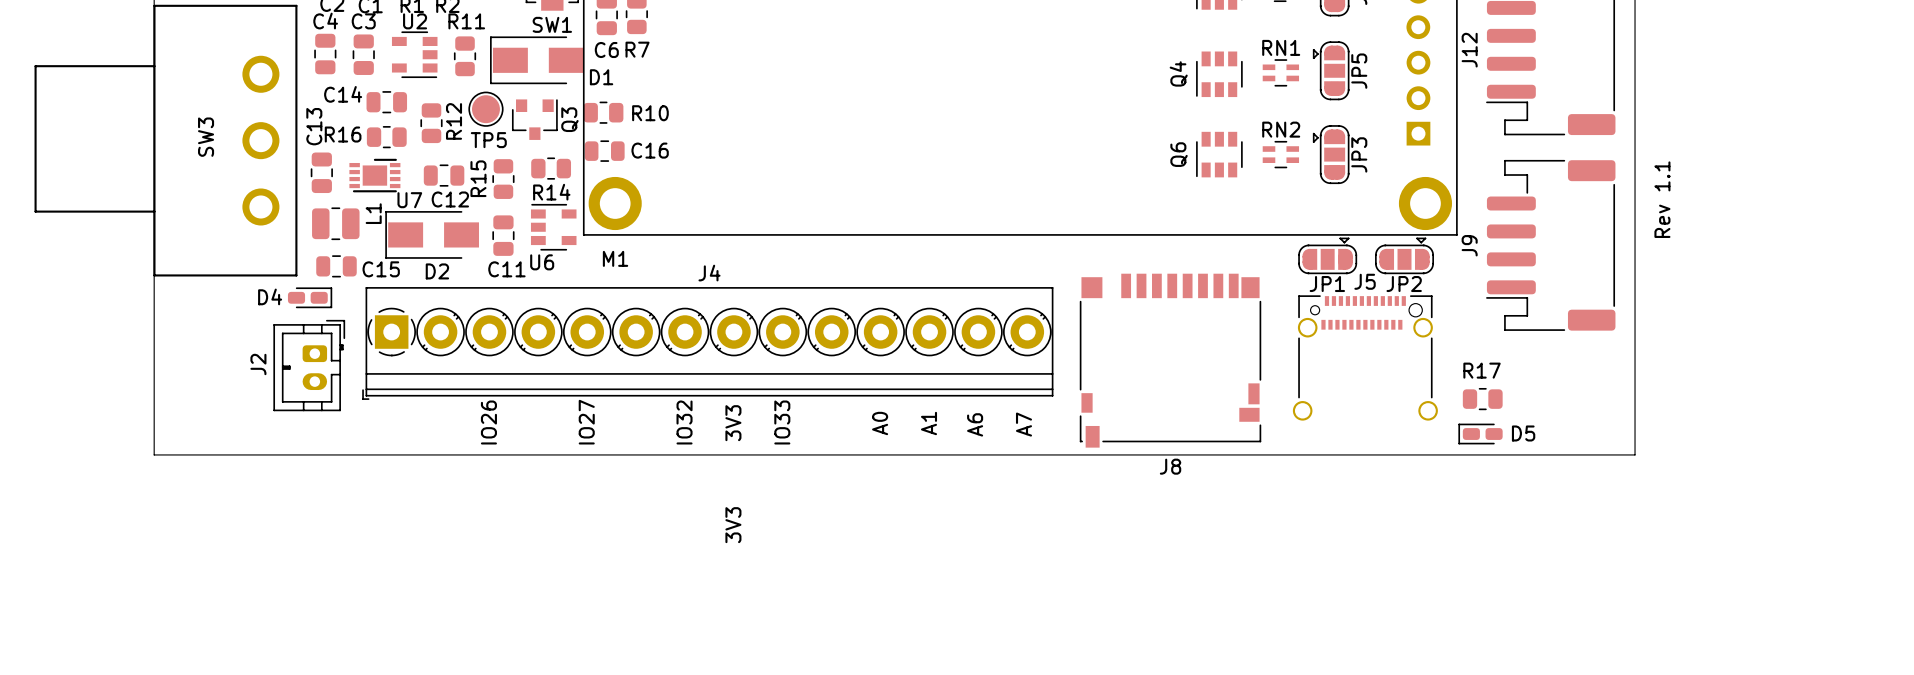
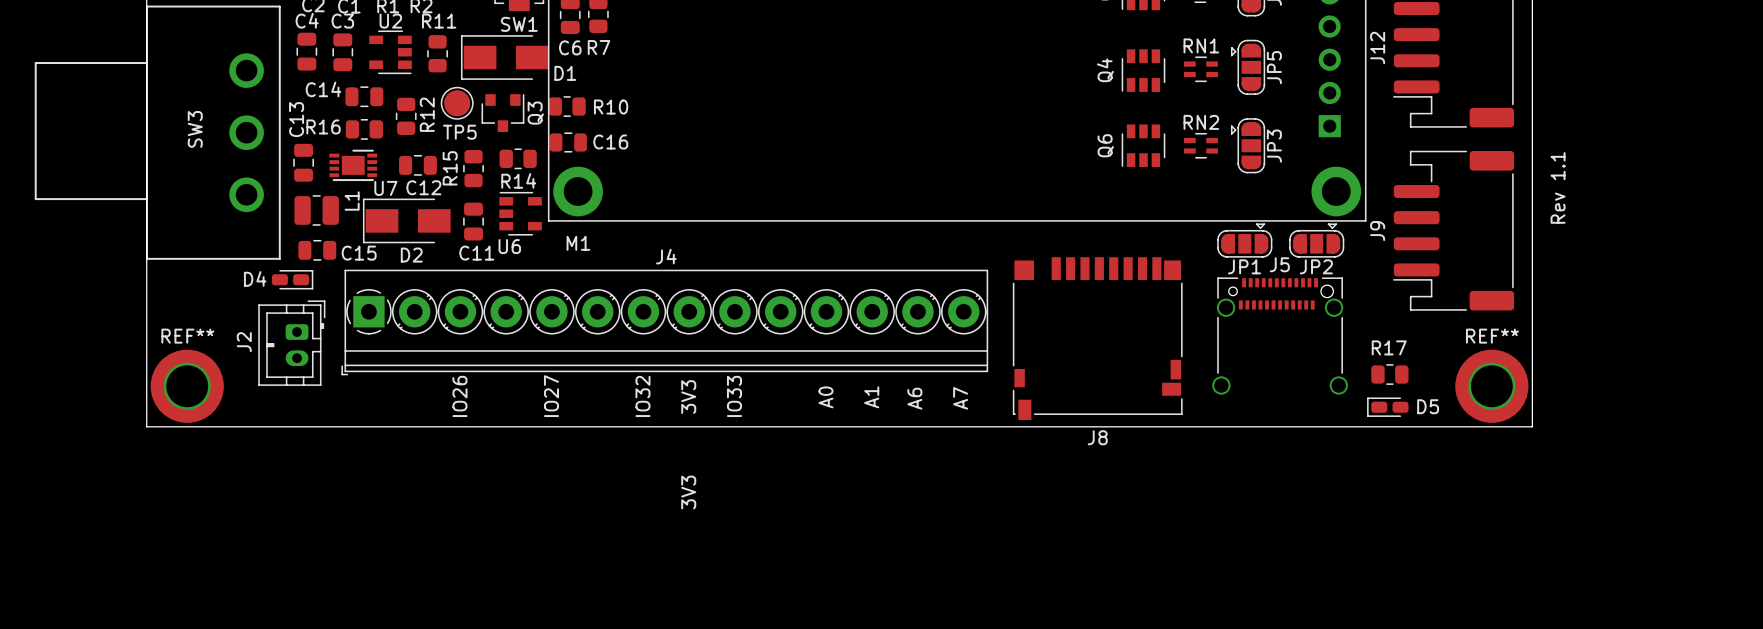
REF**: none -> (187, 386)
REF**: none -> (1491, 386)

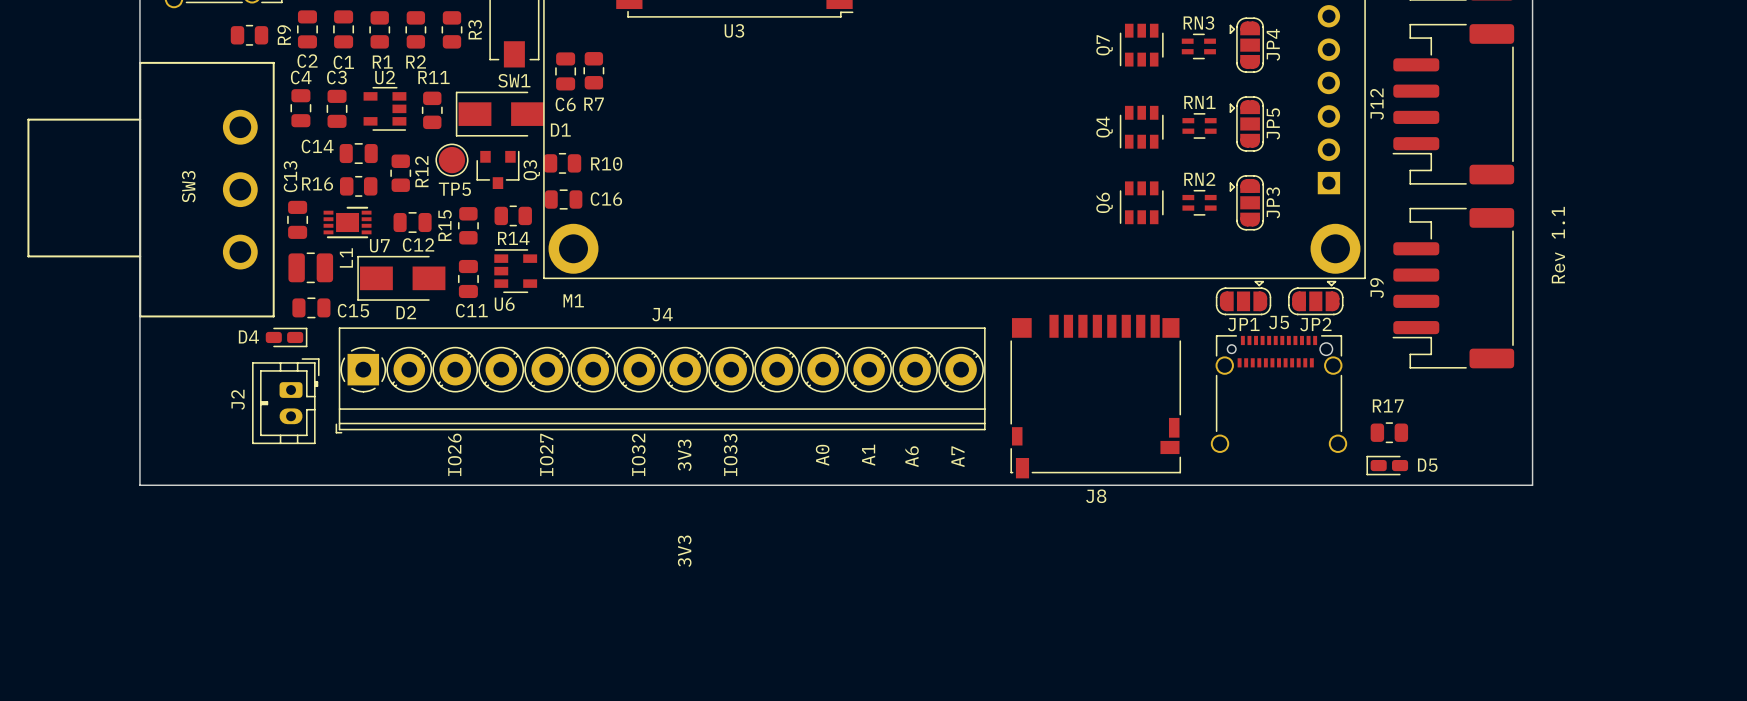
REF**: (187, 386) -> none
REF**: (1491, 386) -> none

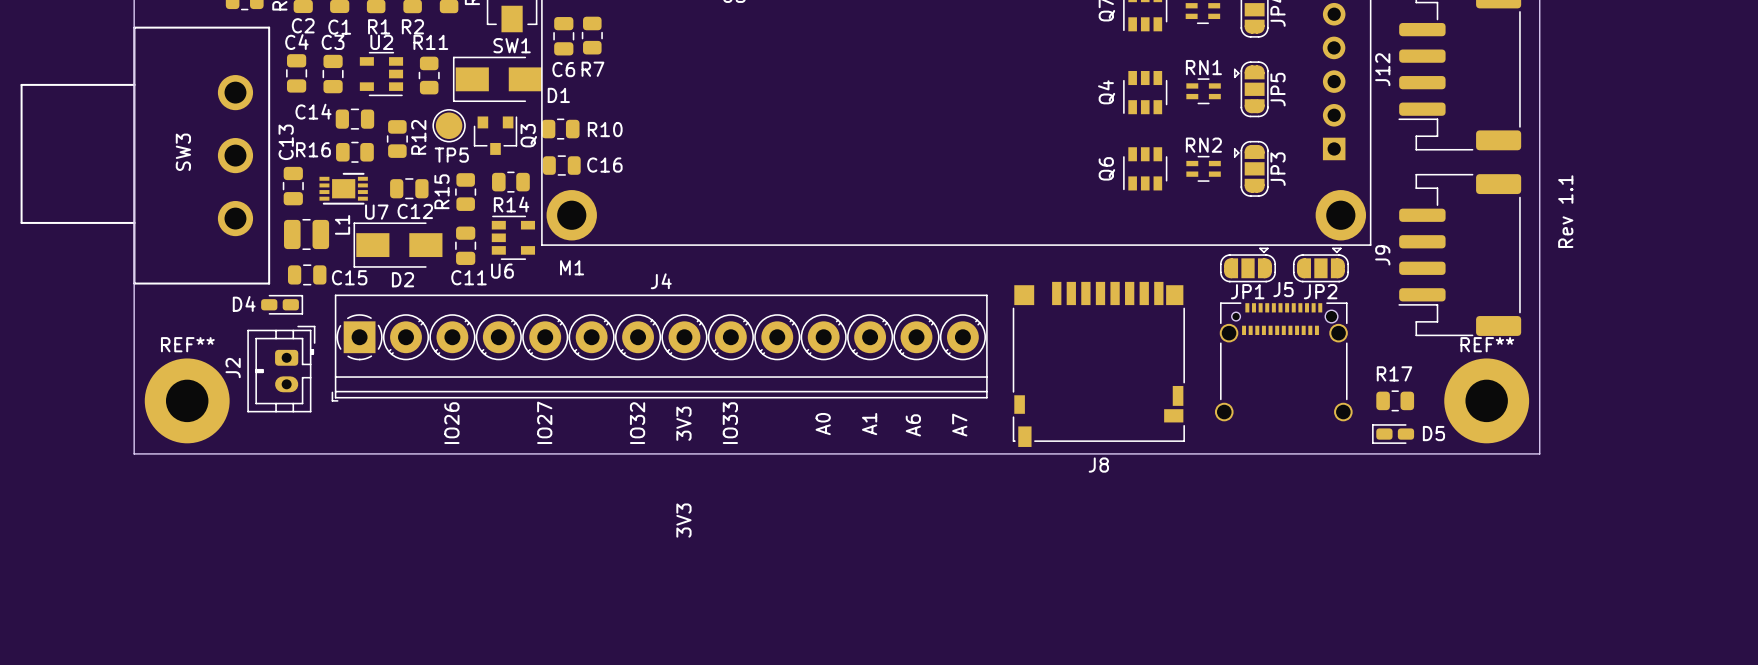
REF**: none -> (187, 400)
REF**: none -> (1486, 400)

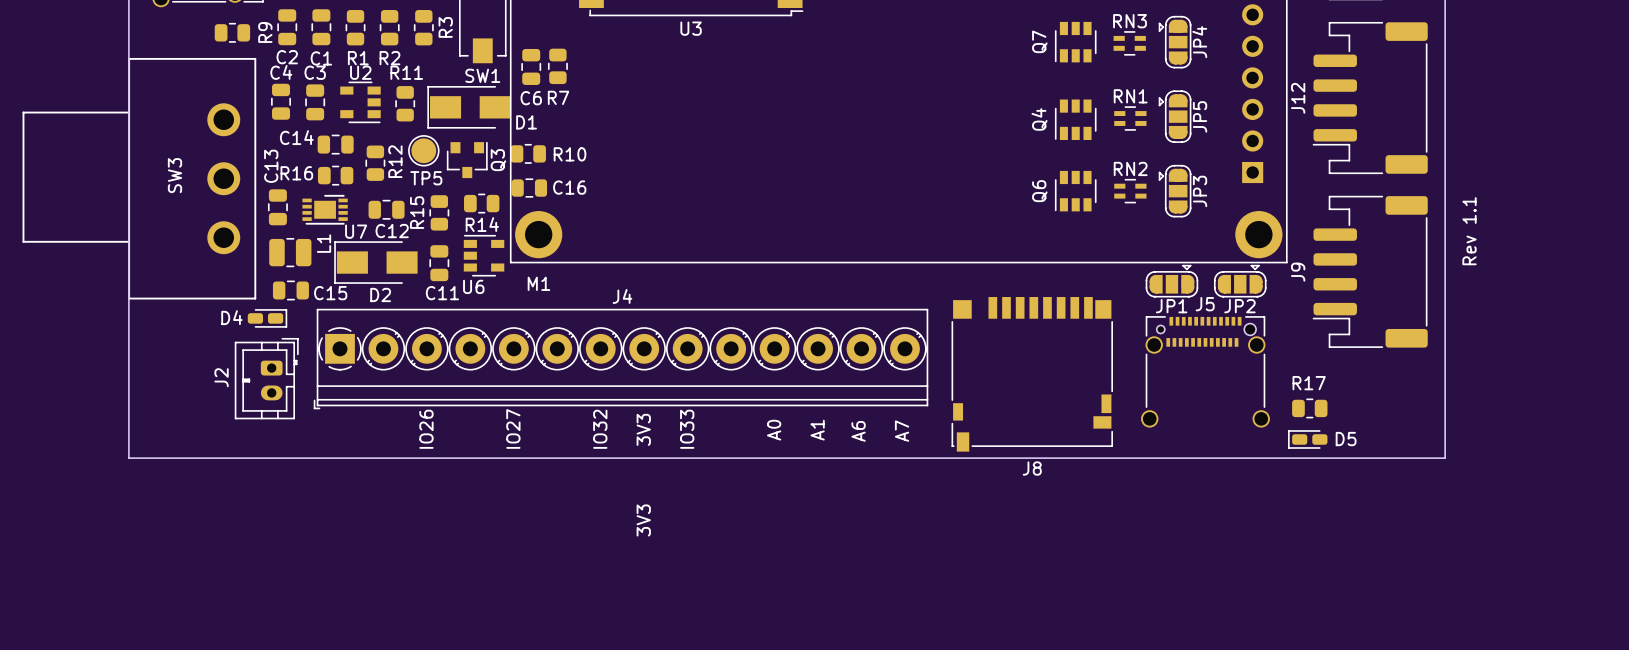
REF**: (187, 400) -> none
REF**: (1486, 400) -> none

